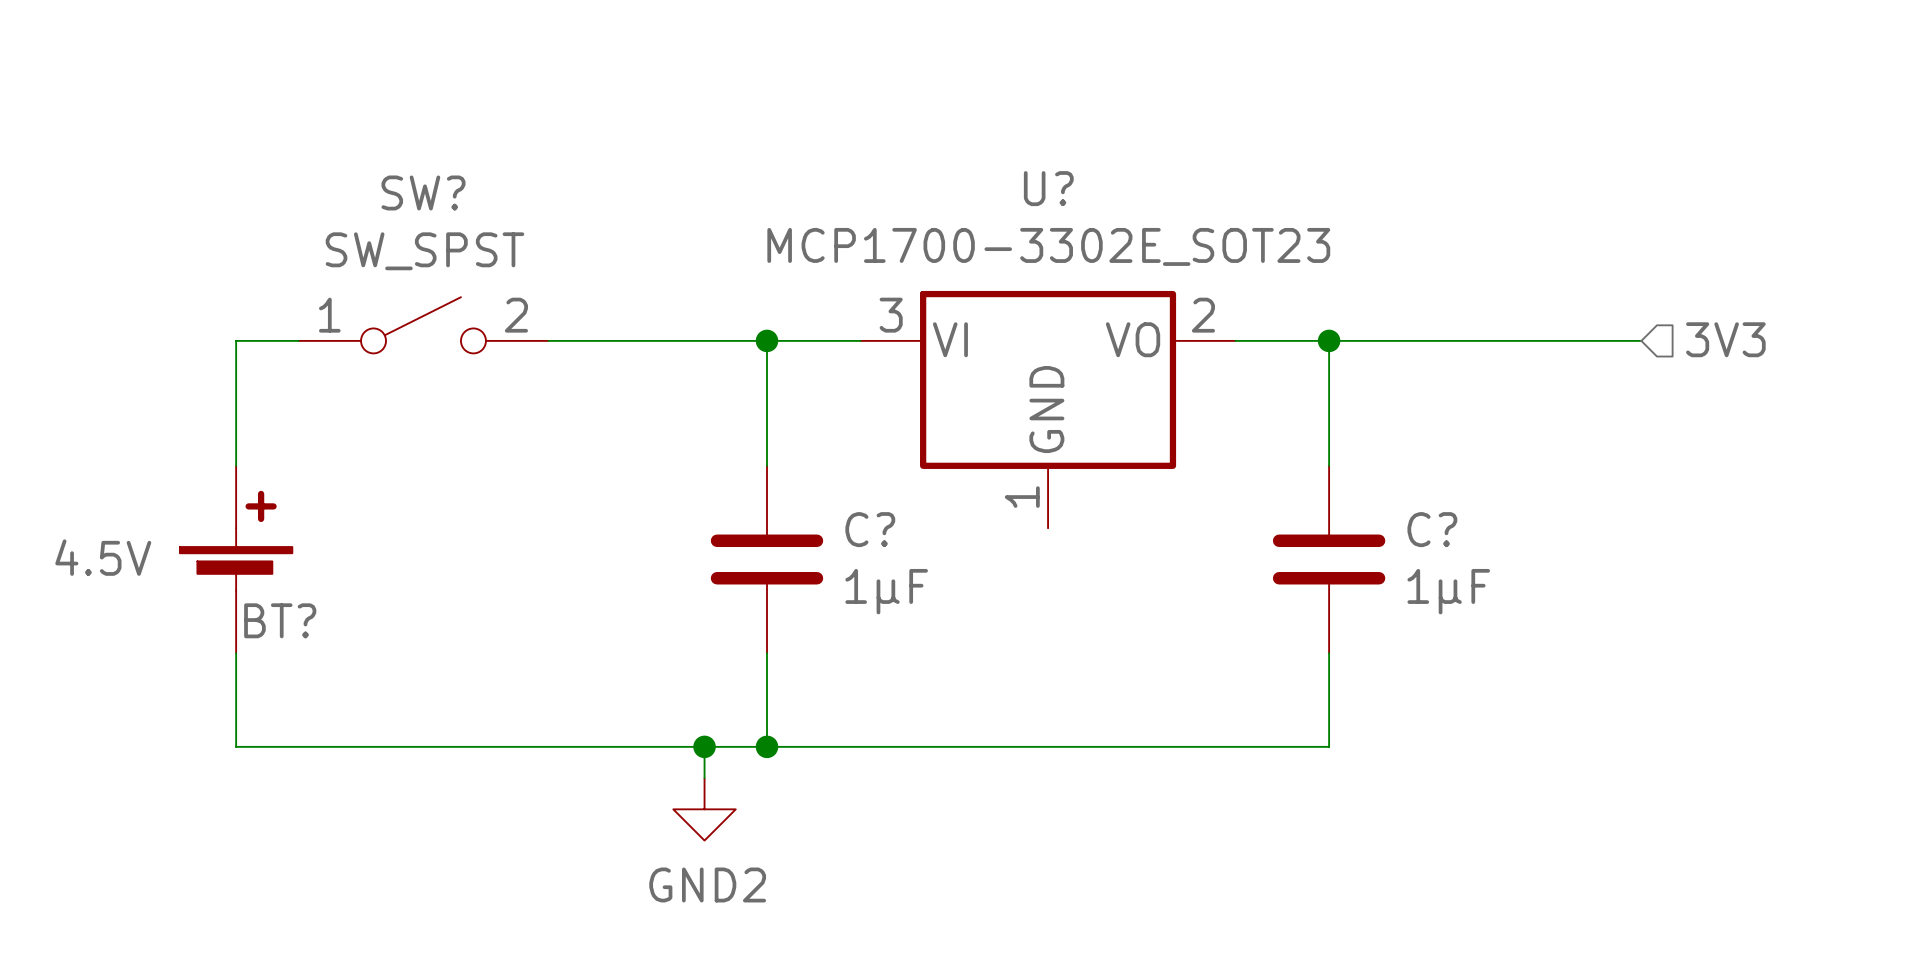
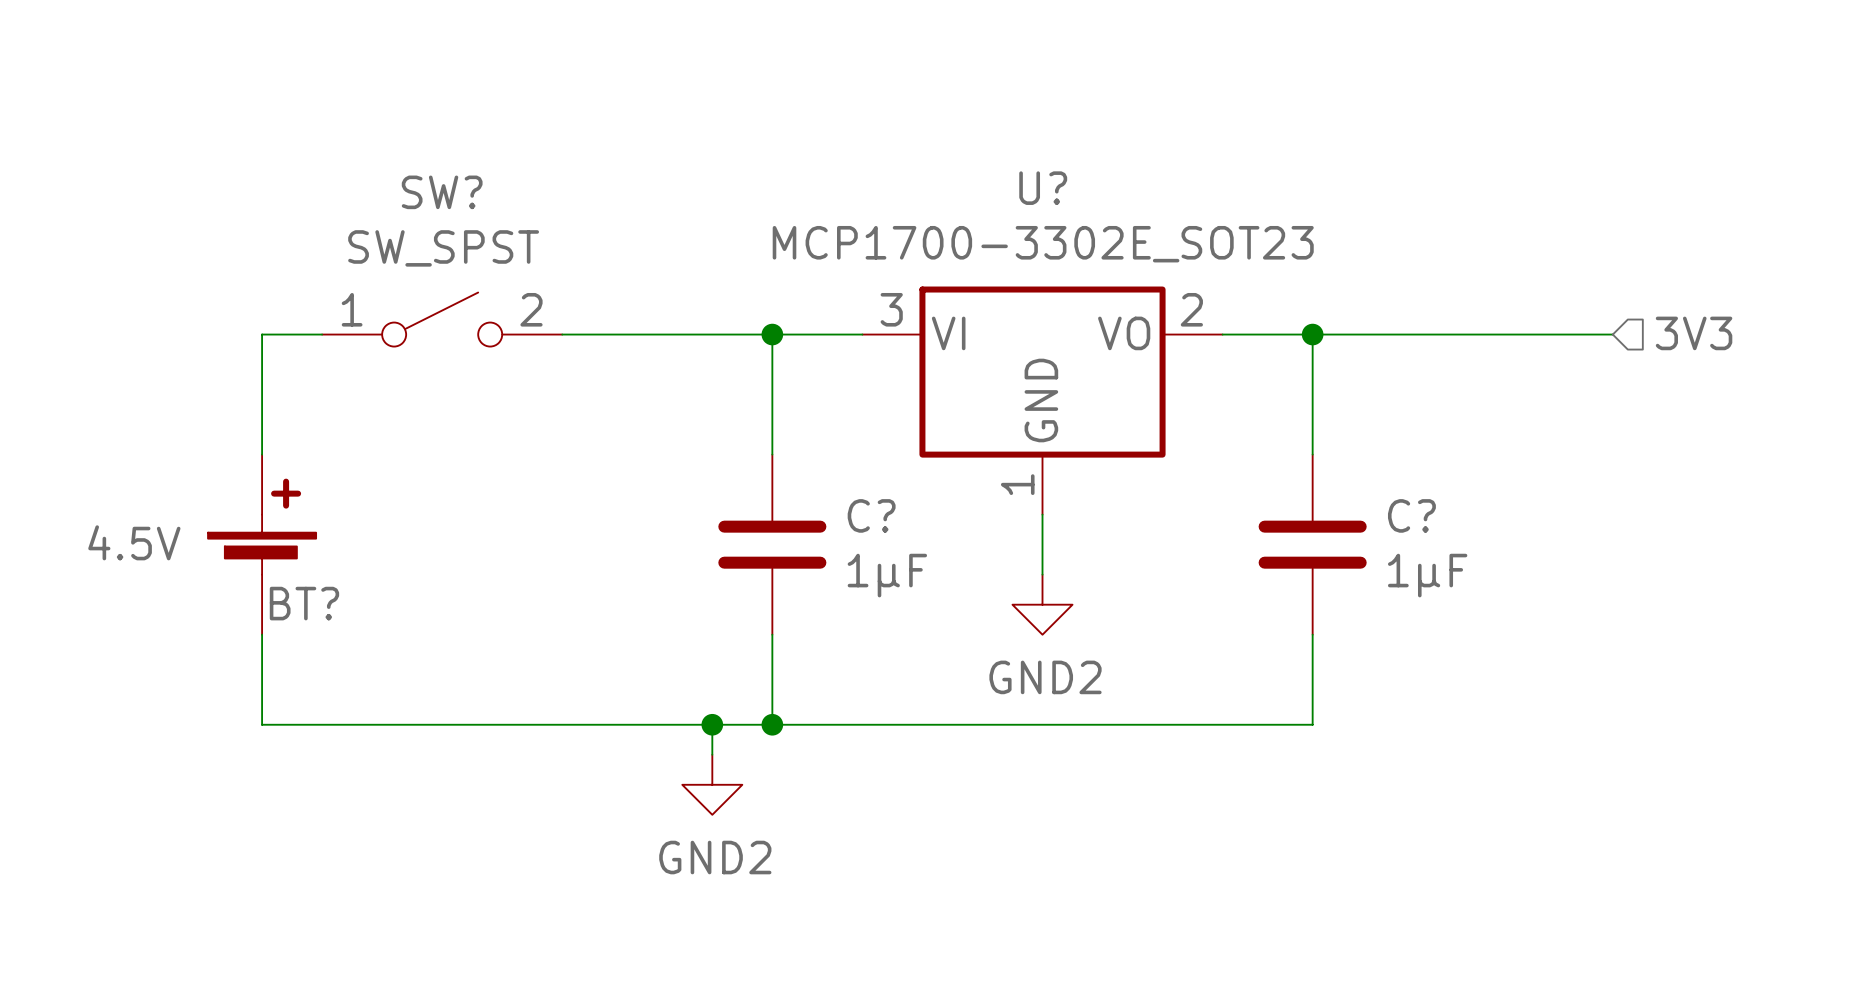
wire: none -> (1042, 514) (1042, 574)
power symbol: none -> GND2 (1042, 604)

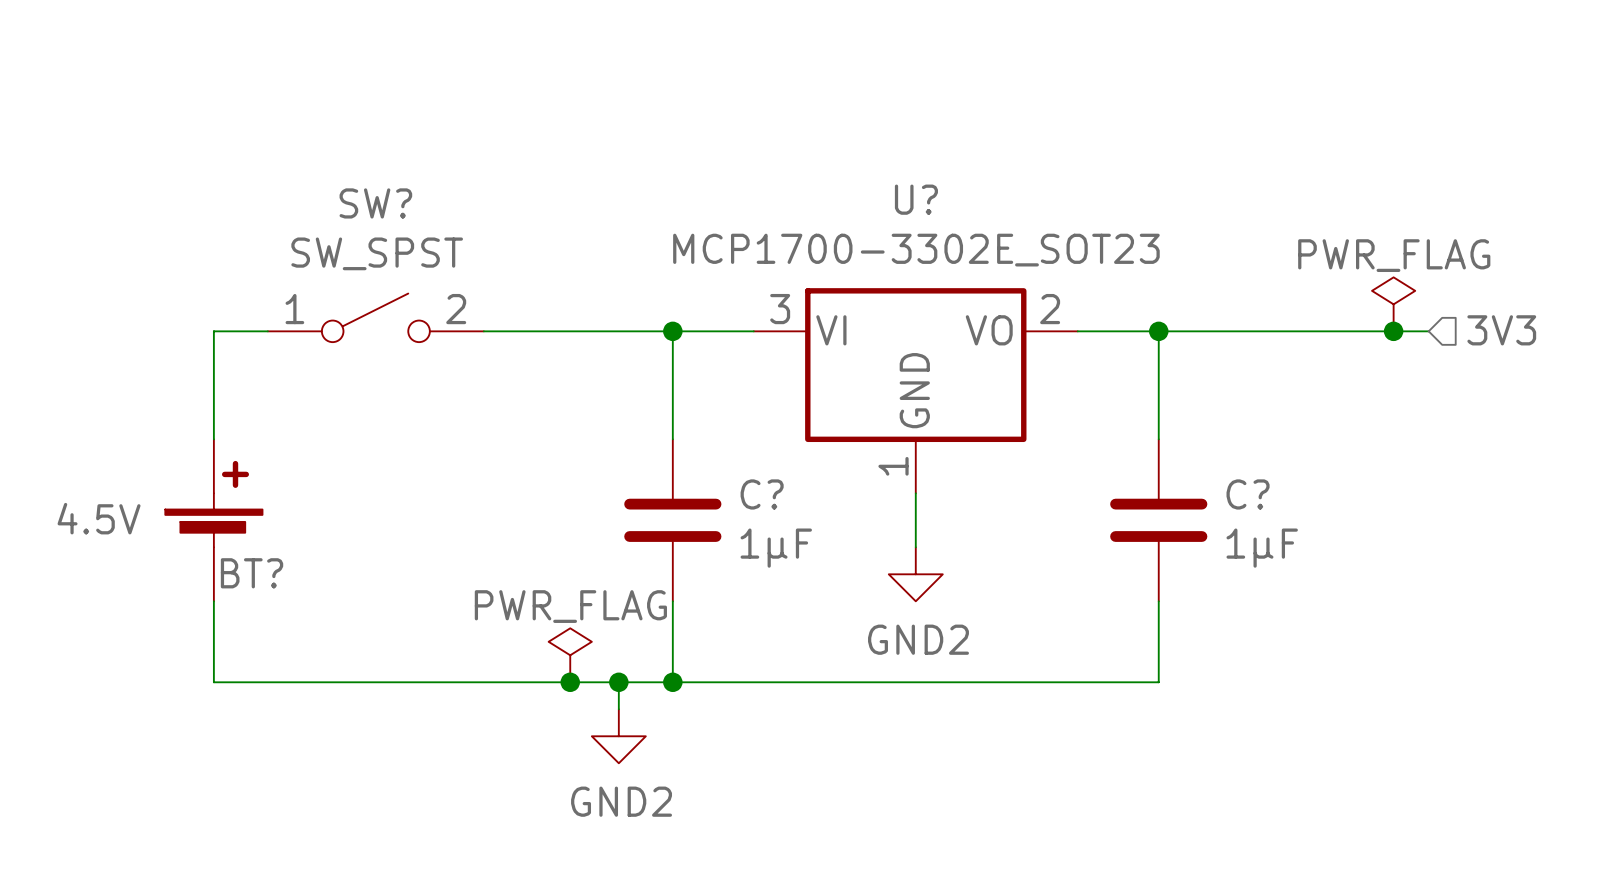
power symbol: none -> PWR_FLAG (1393, 304)
junction: none -> (1393, 331)
power symbol: none -> PWR_FLAG (570, 655)
junction: none -> (570, 682)

